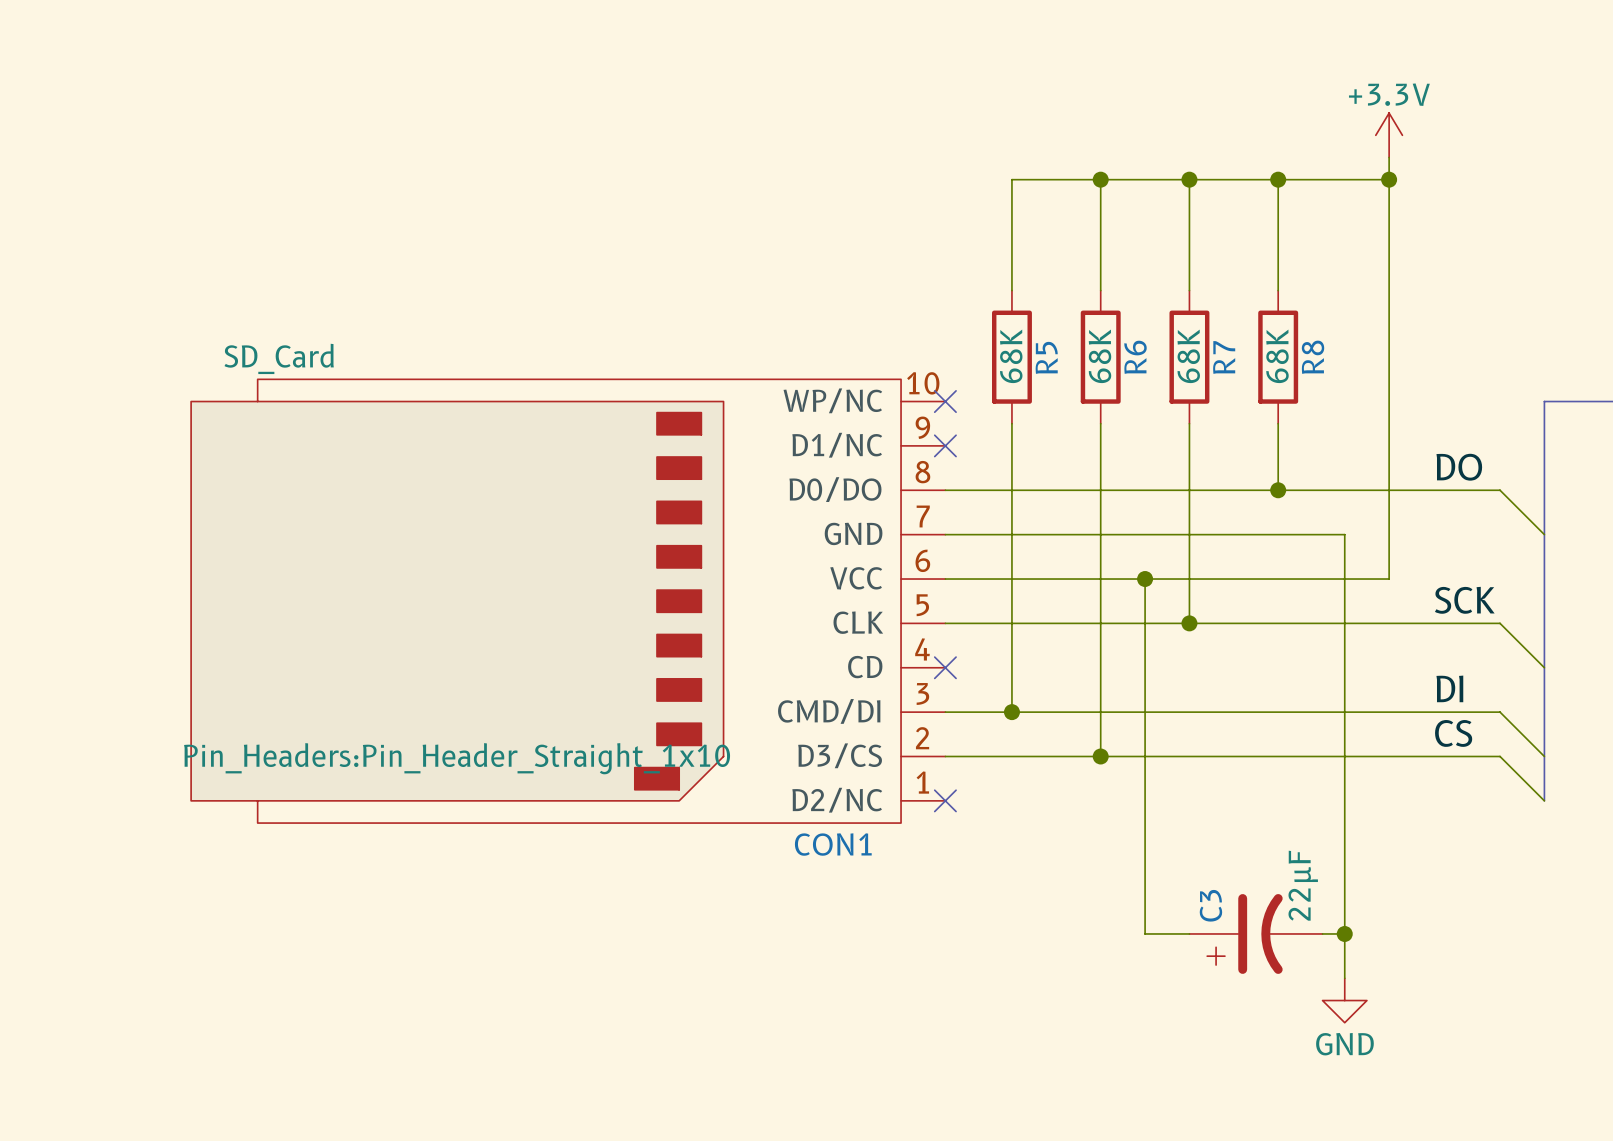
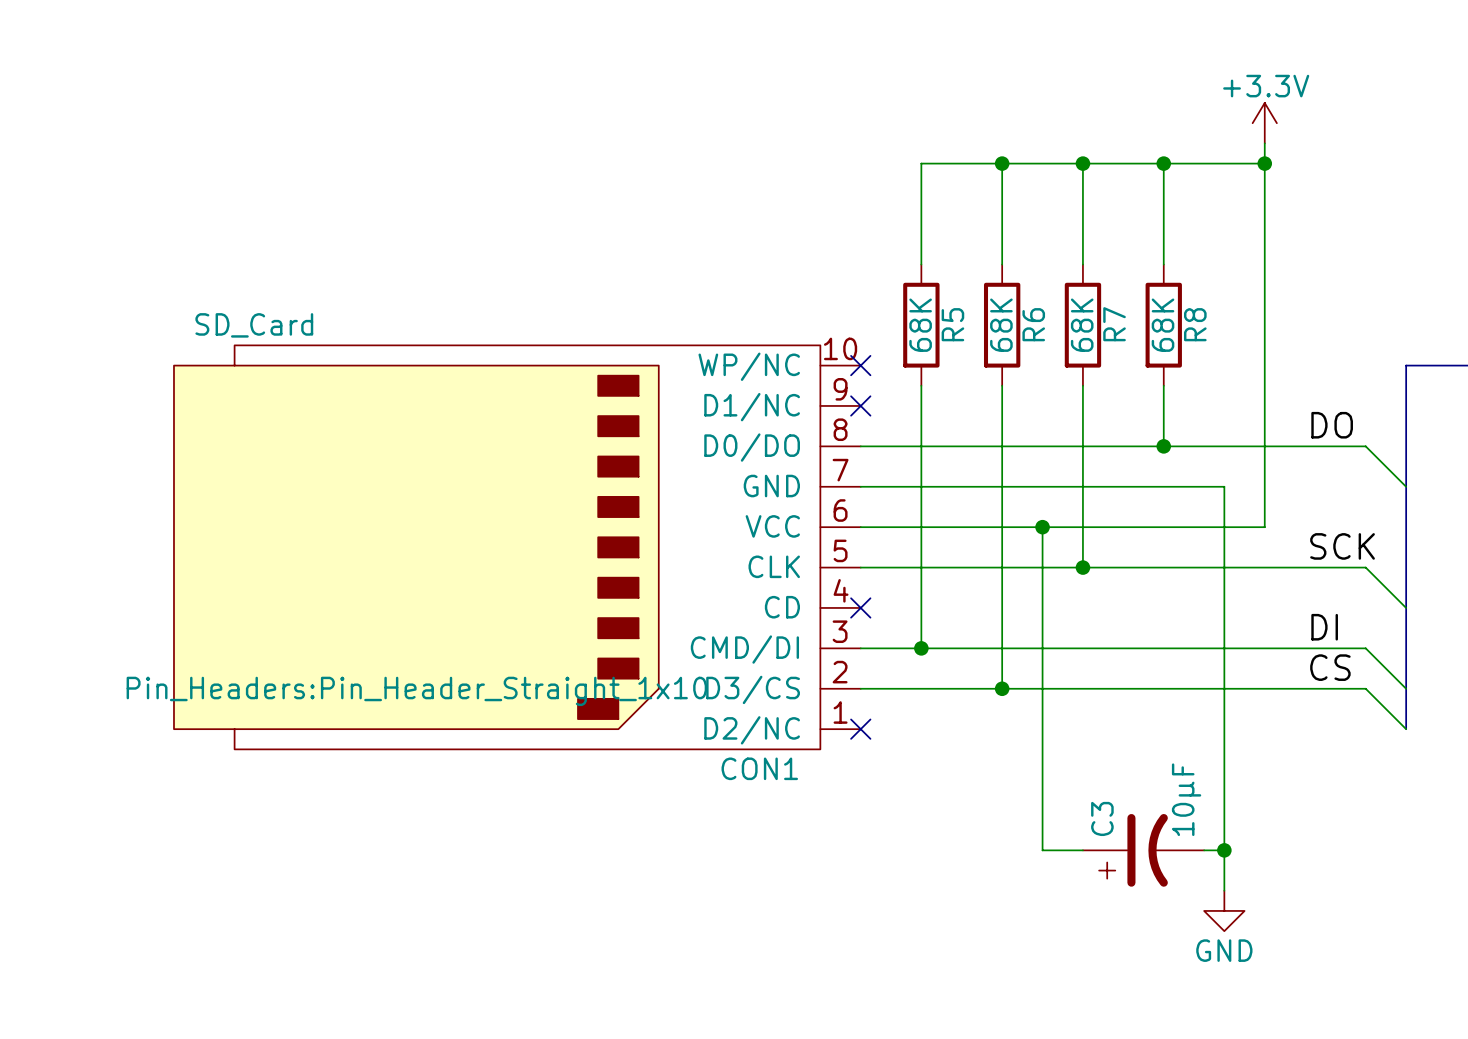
C3 value: 22µF (1303, 885) -> 10µF (1186, 799)

